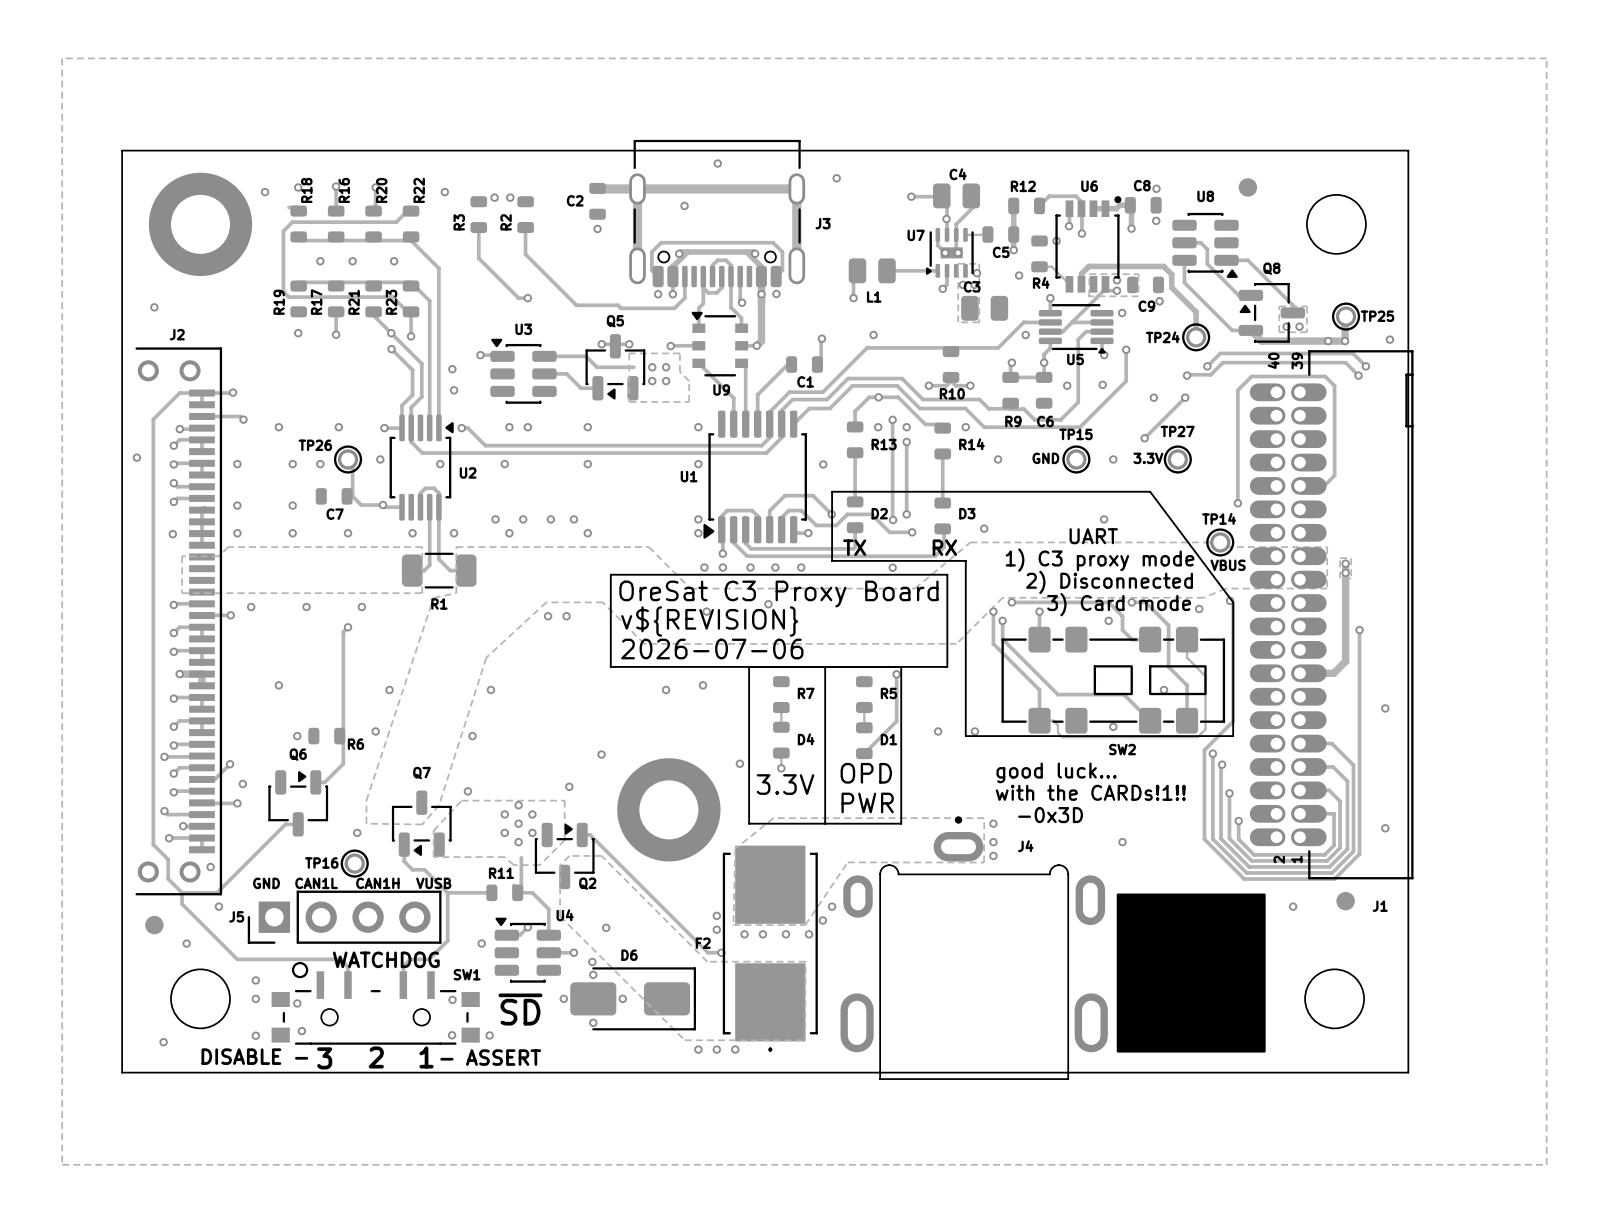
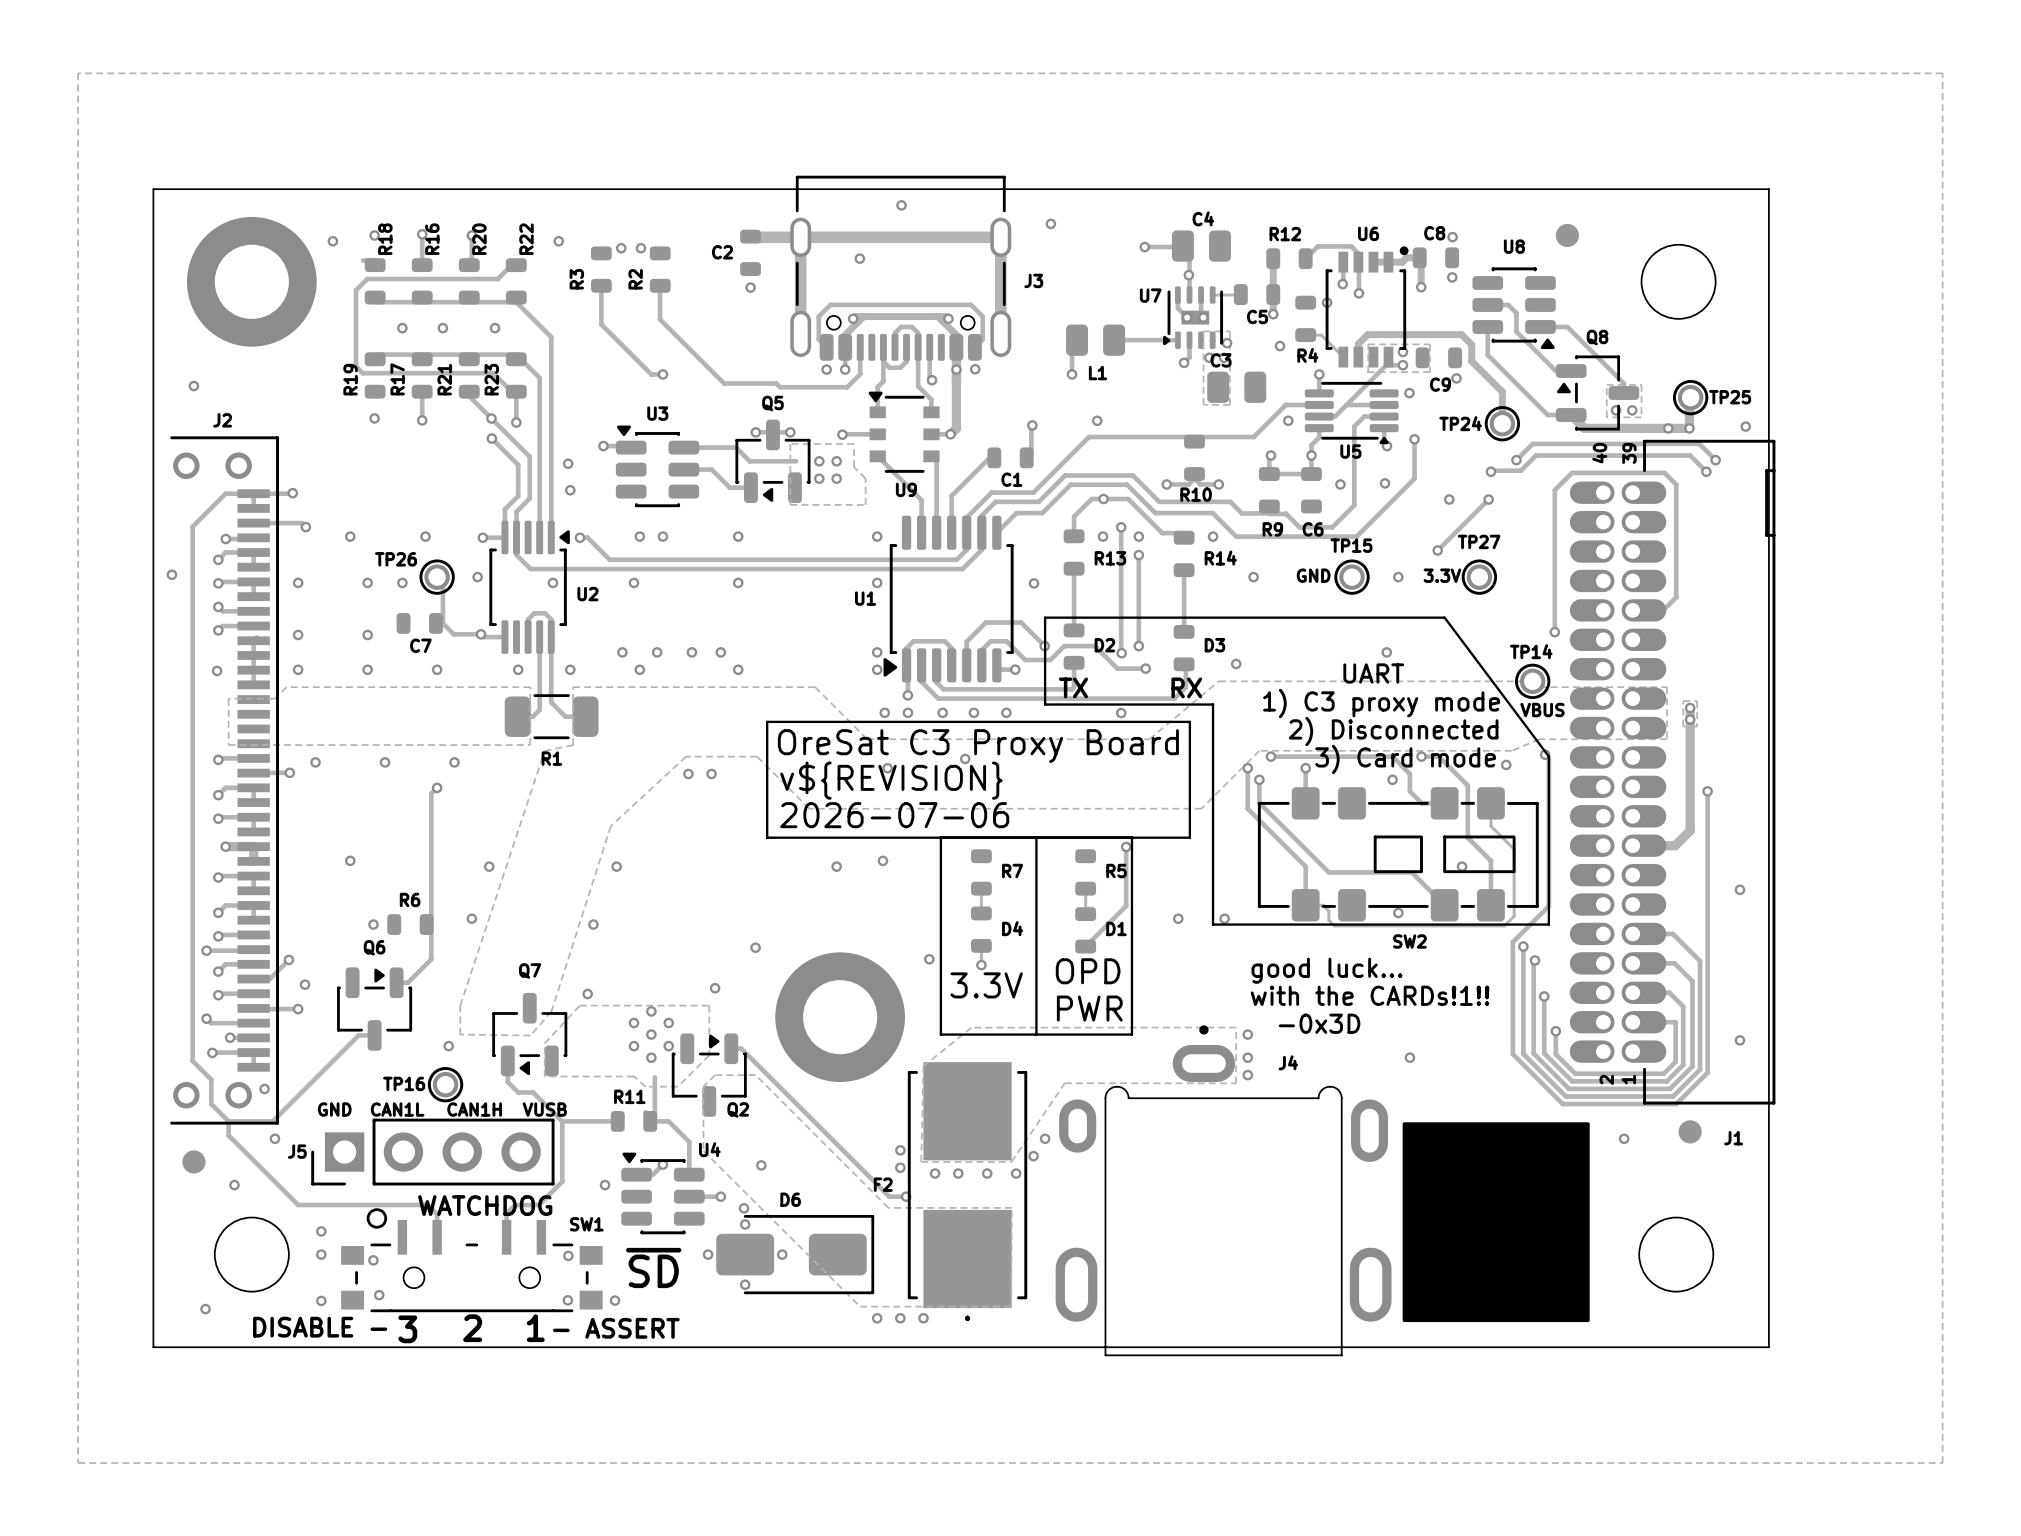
track: (973, 195) (973, 207) (956, 224) (956, 234) -> none
R6 name position: R6 (355, 744) -> R6 (410, 899)

